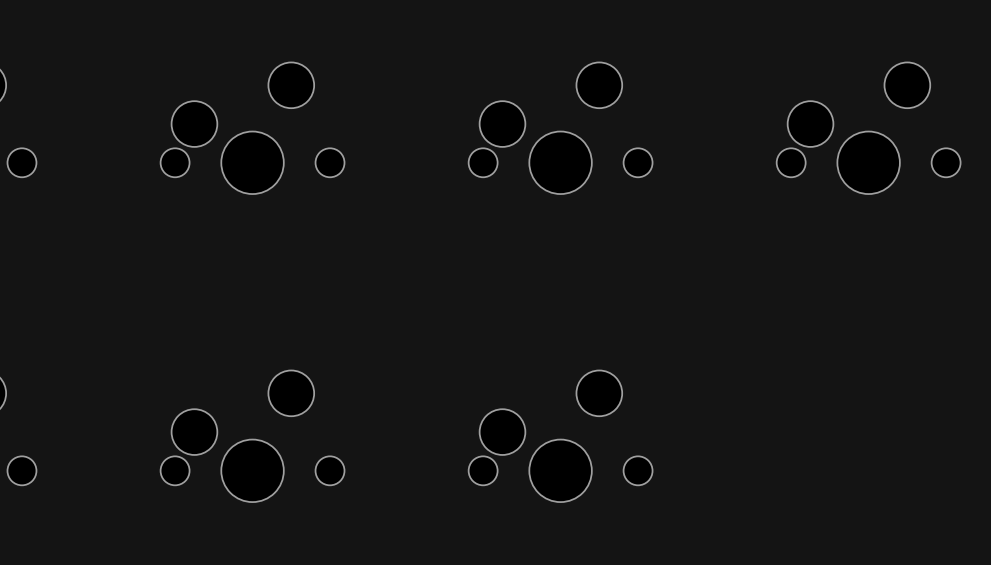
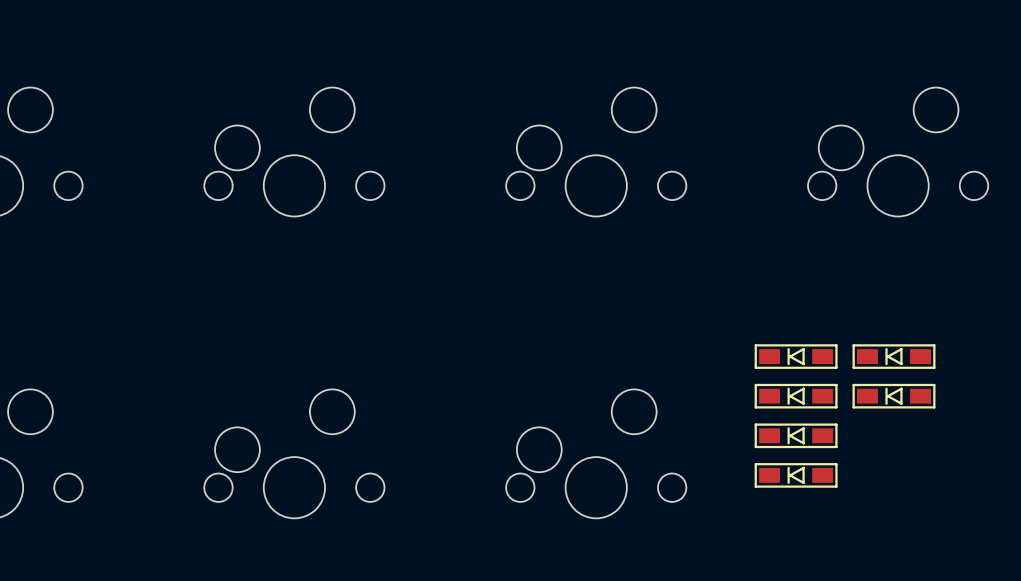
part: none -> (796, 356)
part: none -> (893, 356)
part: none -> (796, 396)
part: none -> (893, 396)
part: none -> (796, 435)
part: none -> (796, 475)

